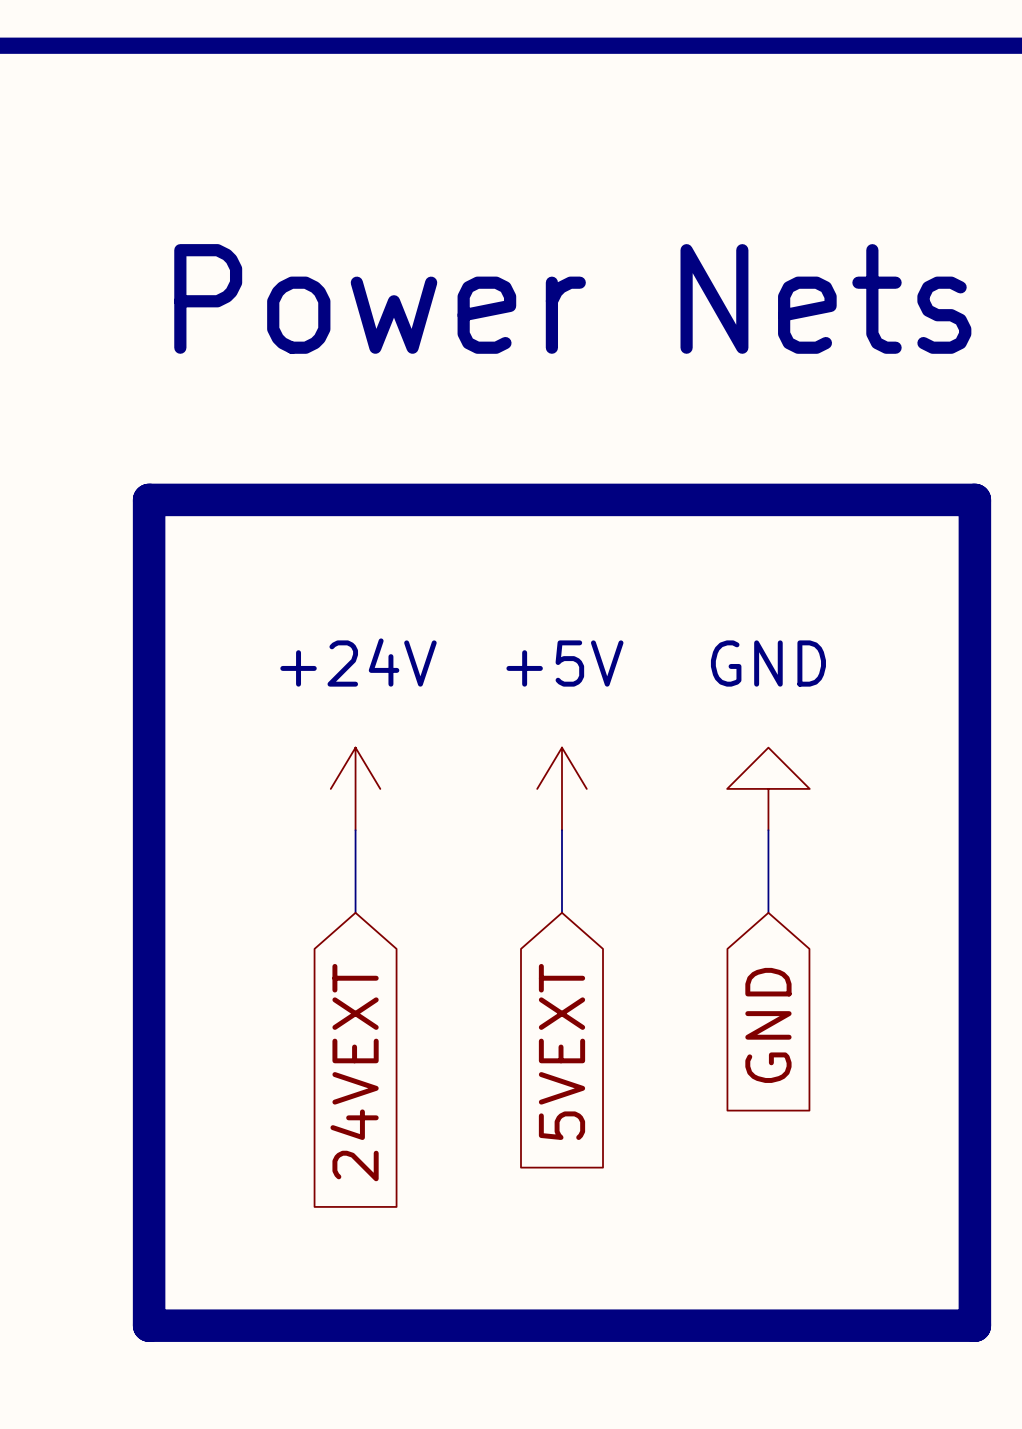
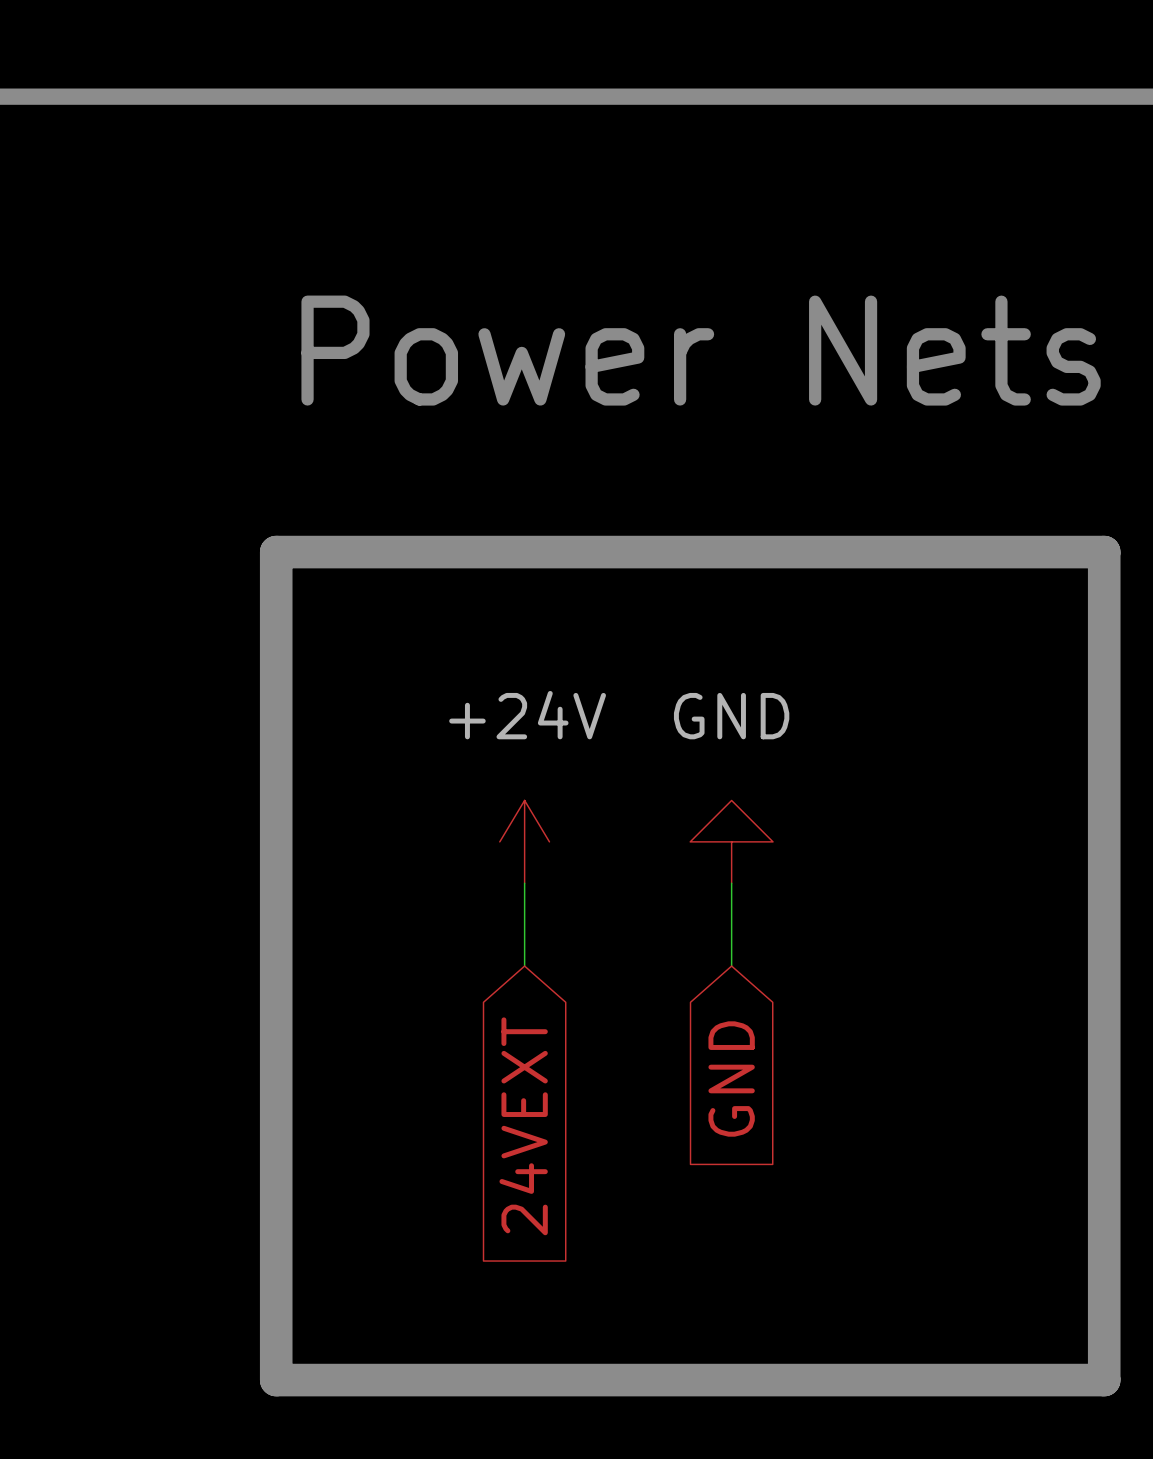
power symbol position: +24V (355, 788) -> +24V (524, 841)
power symbol: +5V (562, 788) -> none
power symbol position: GND (768, 788) -> GND (731, 841)
wire: (355, 830) (355, 912) -> (524, 883) (524, 966)
wire: (562, 830) (562, 912) -> (731, 883) (731, 966)
wire: (768, 830) (768, 912) -> none
global label position: GND (768, 1025) -> GND (731, 1079)
global label: 5VEXT (562, 1051) -> none
global label position: 24VEXT (354, 1072) -> 24VEXT (523, 1126)

